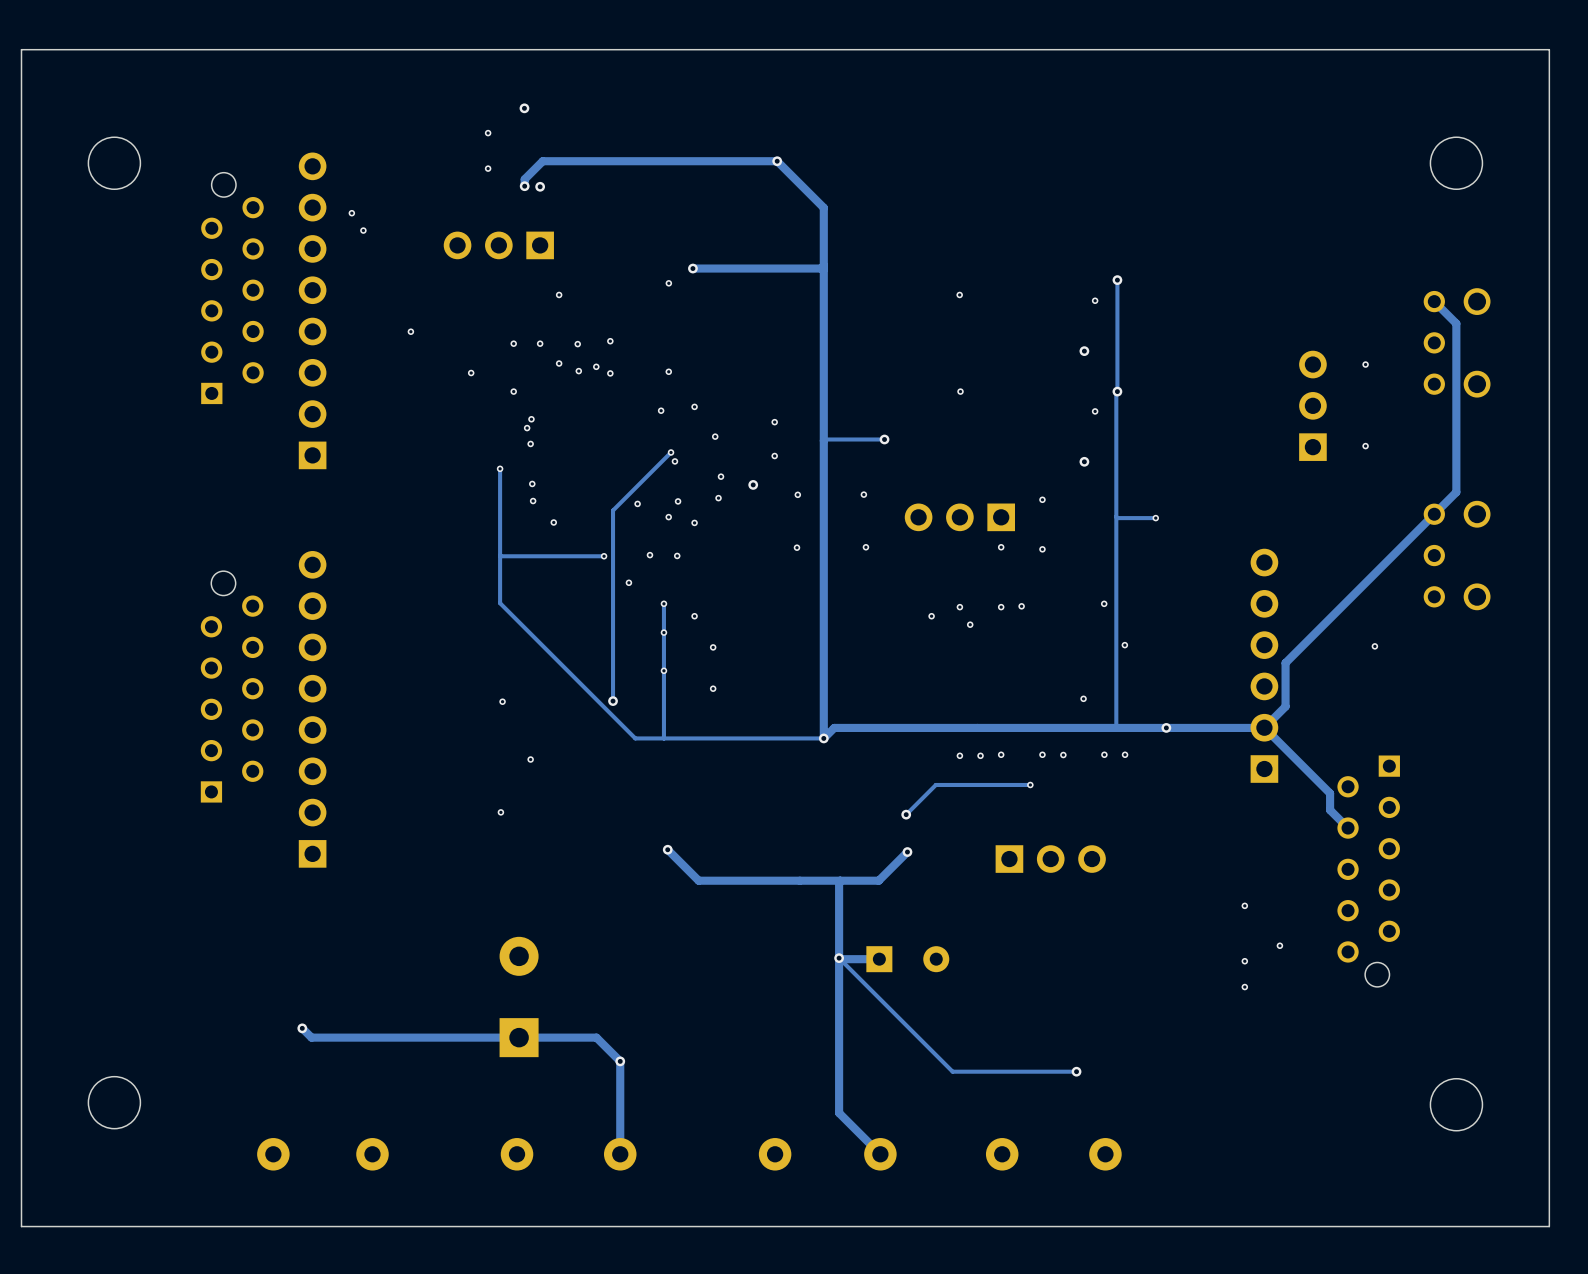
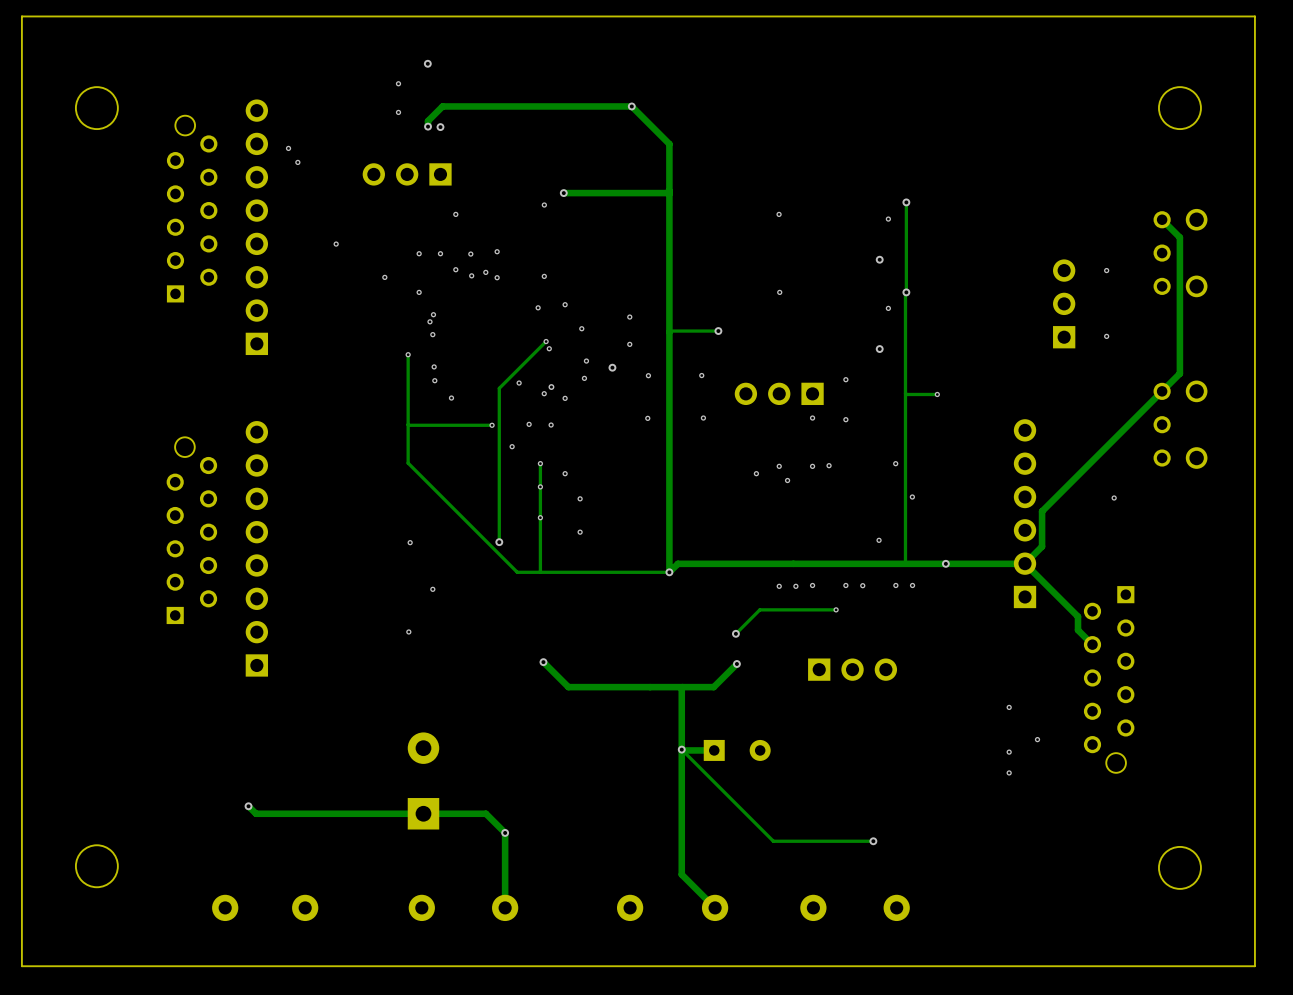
via: (678, 501) -> none
via: none -> (551, 387)

